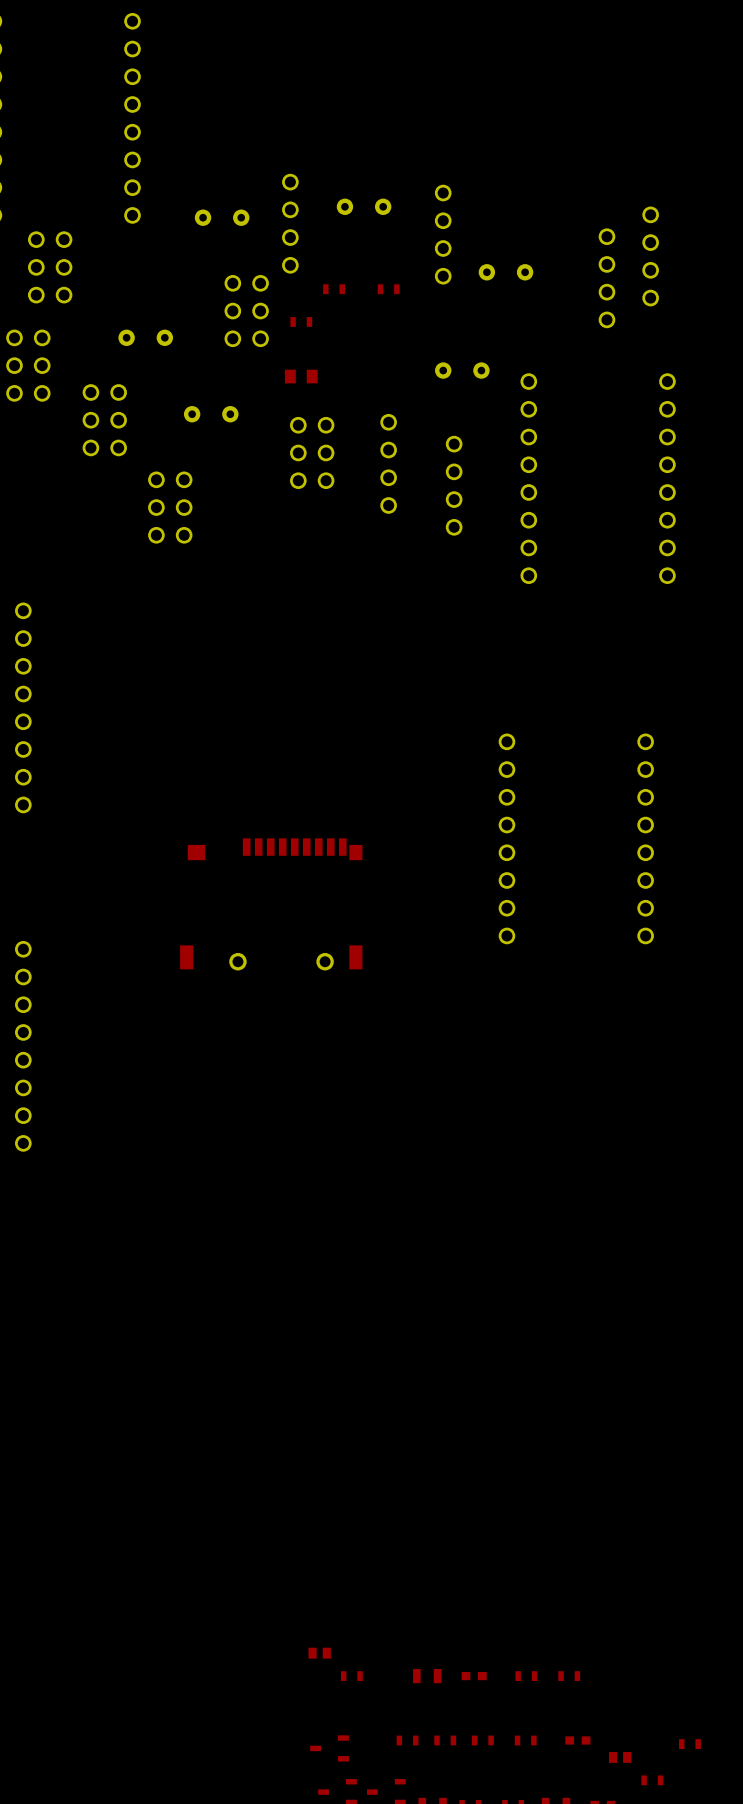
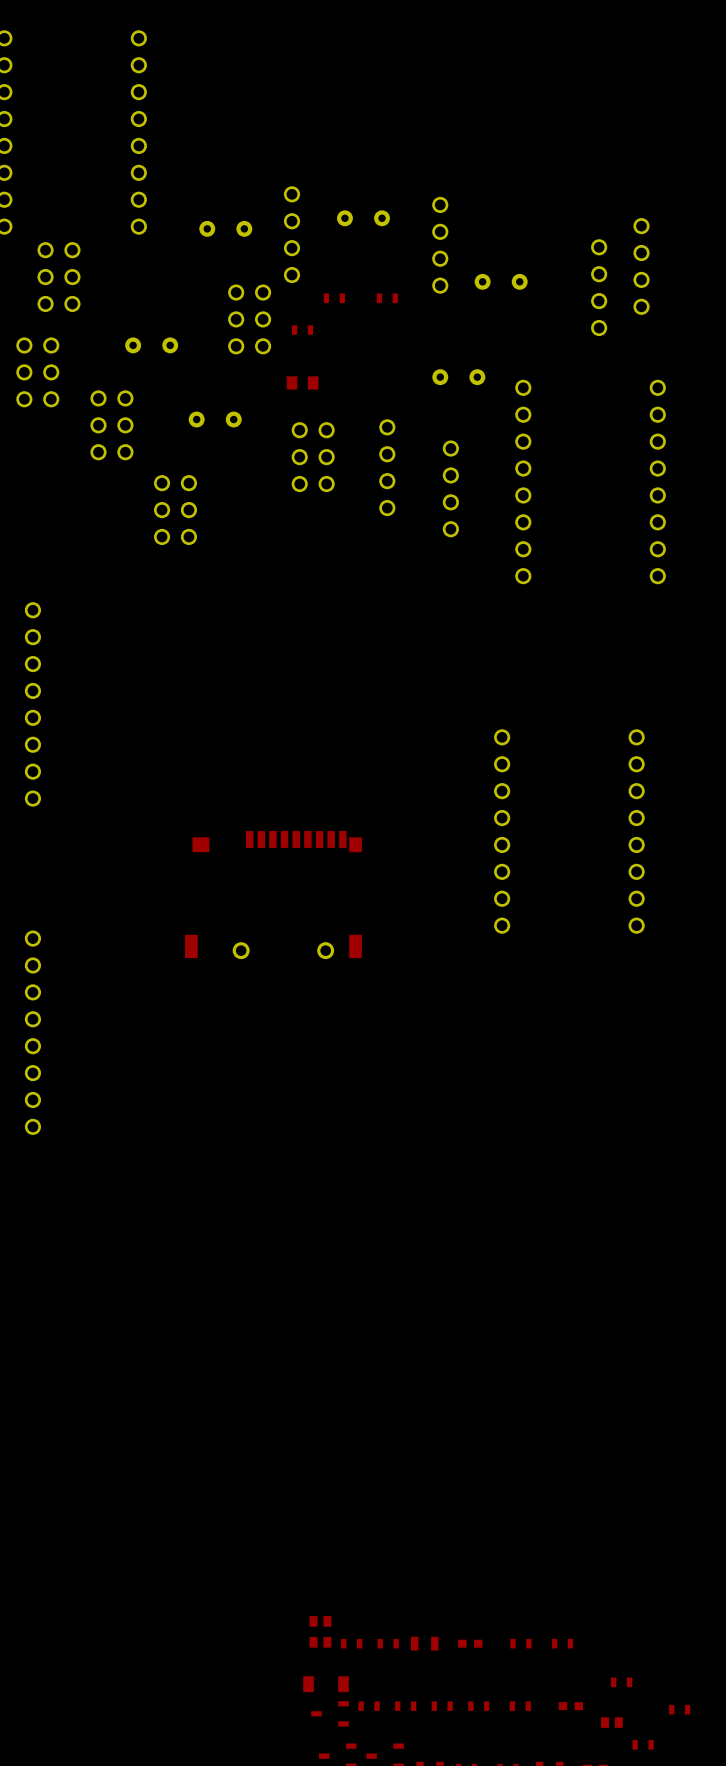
part: none -> (320, 1642)
part: none -> (388, 1643)
part: none -> (621, 1682)
part: none -> (325, 1684)
part: none -> (369, 1706)

